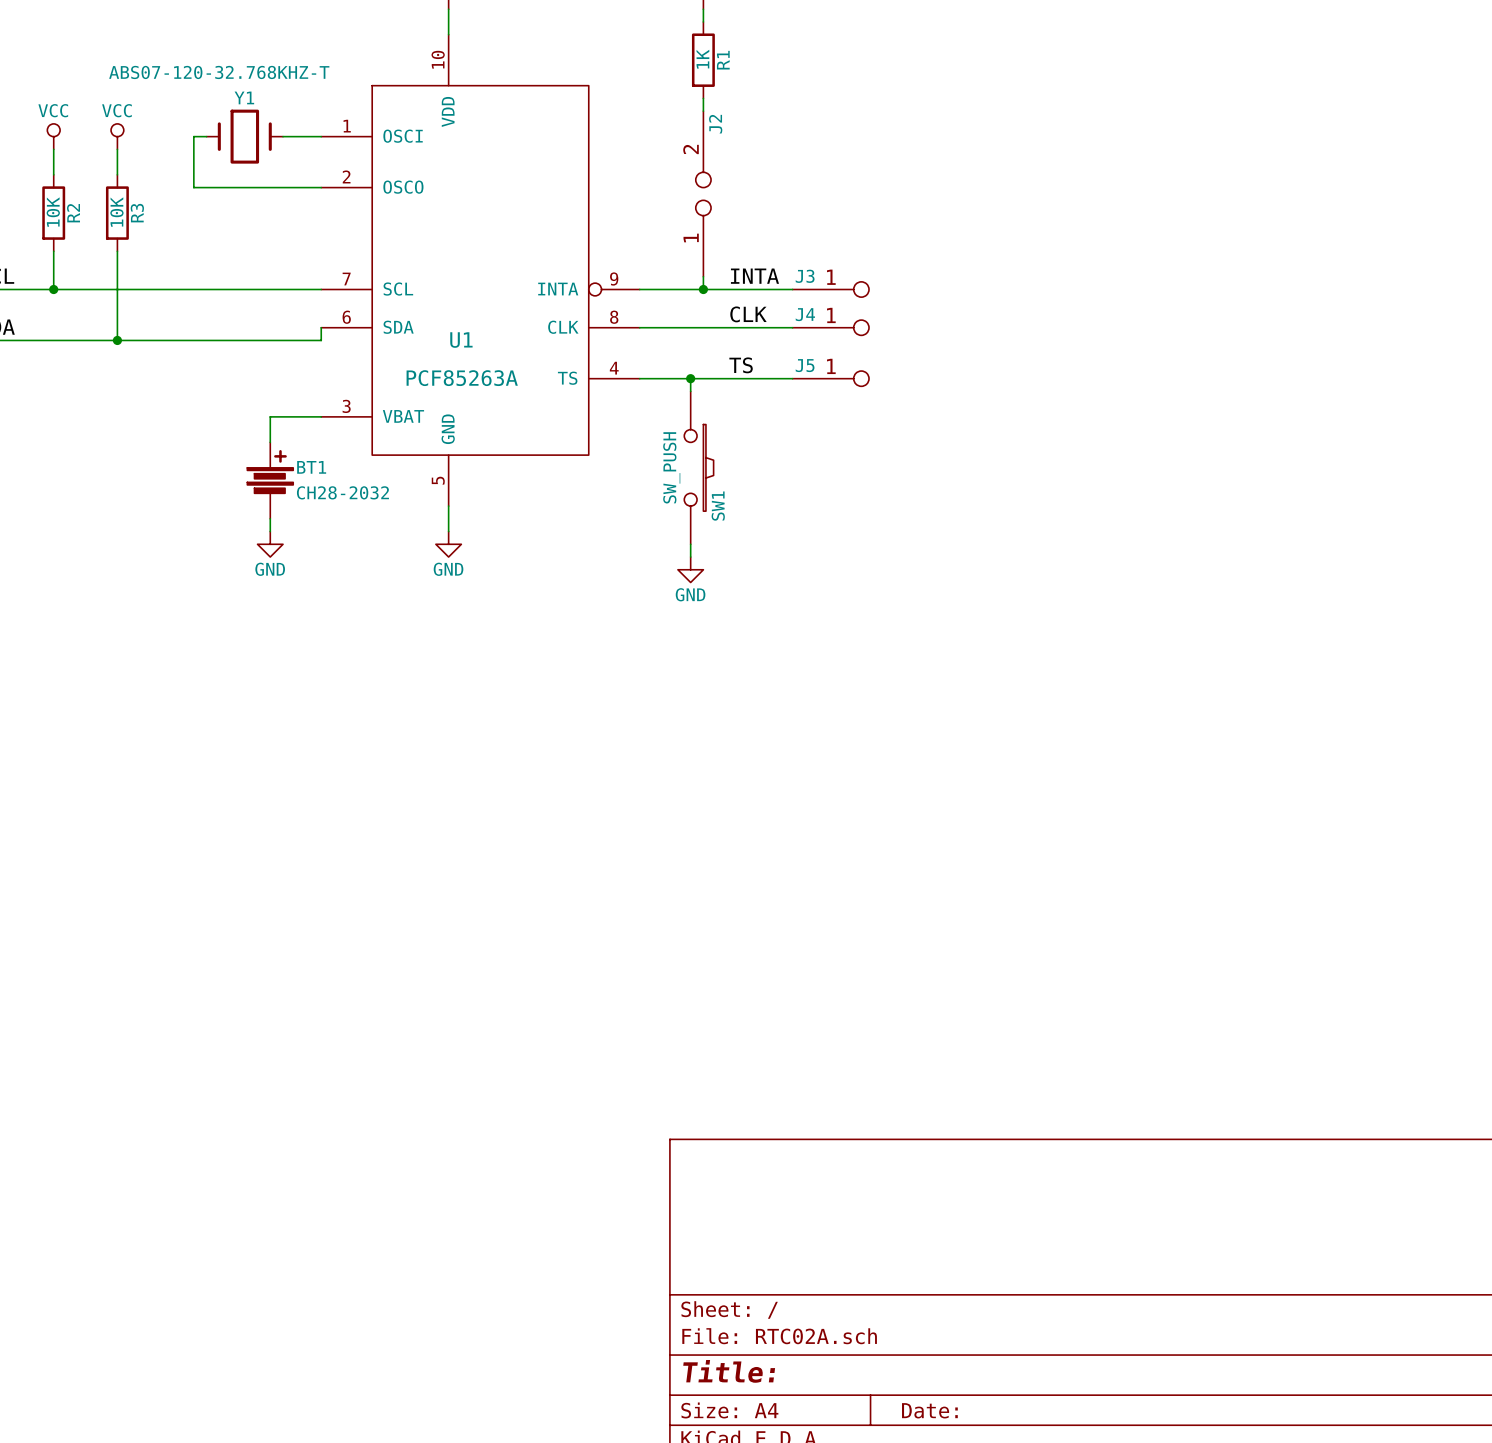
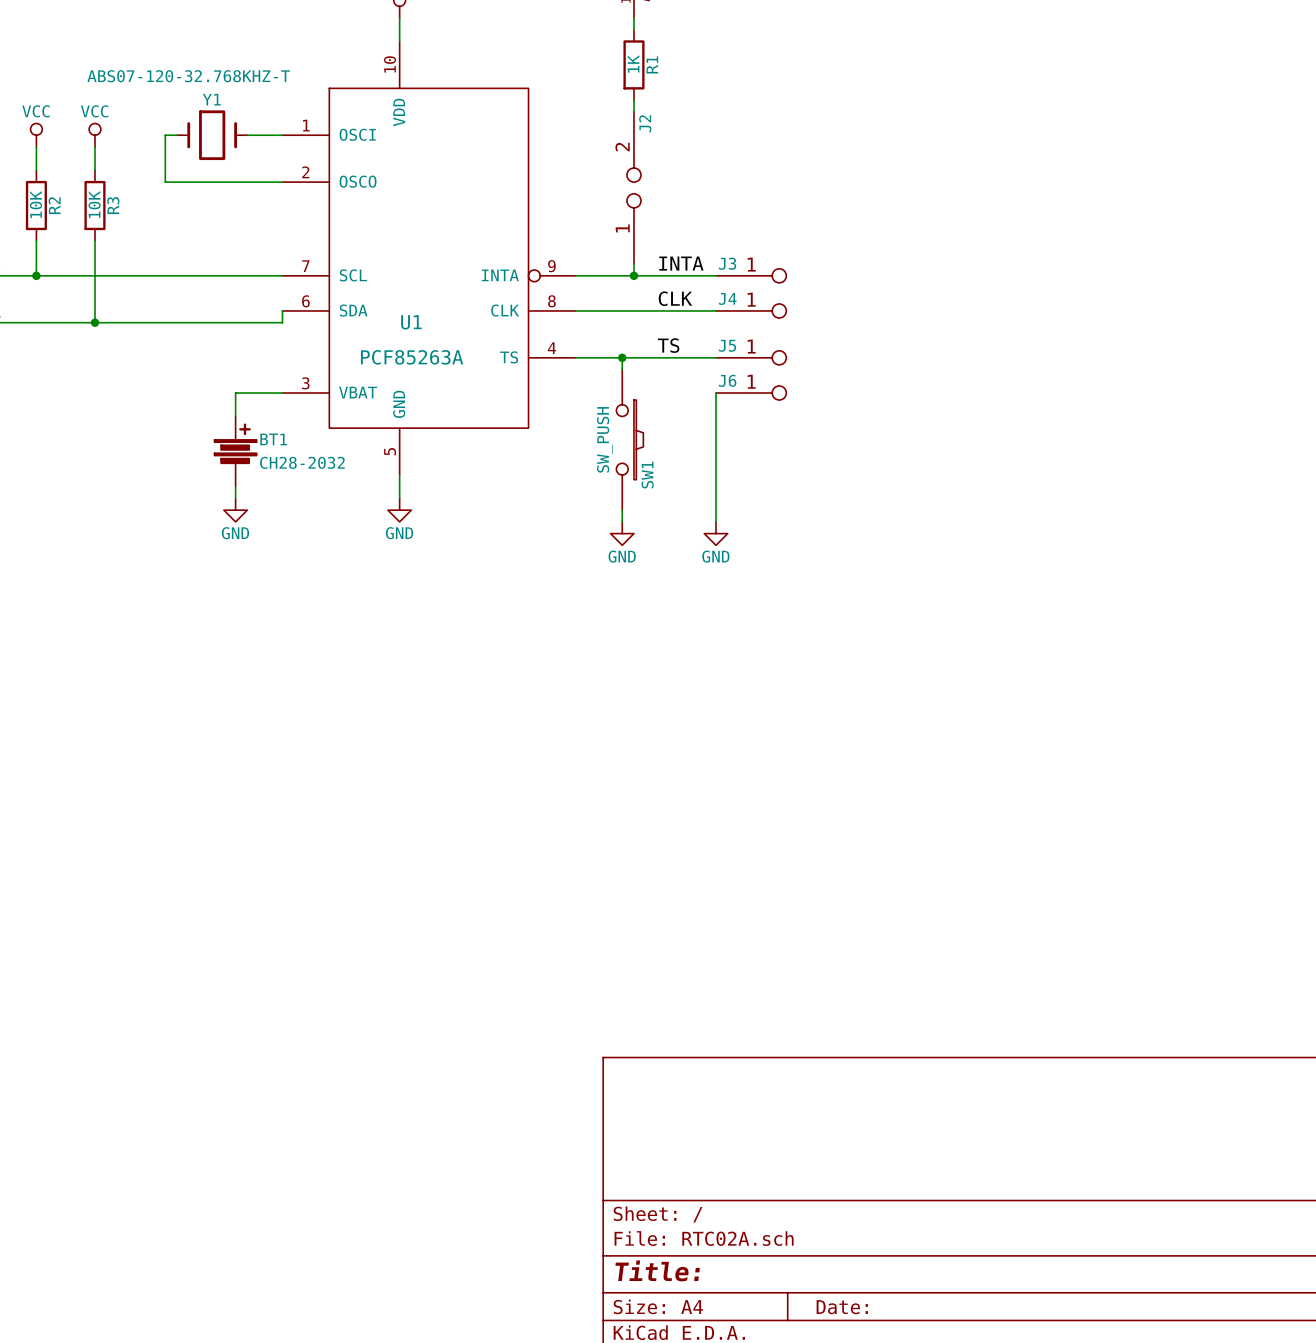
wire: none -> (716, 393) (716, 521)
J6: none -> (751, 393)
power symbol: none -> GND (716, 533)

